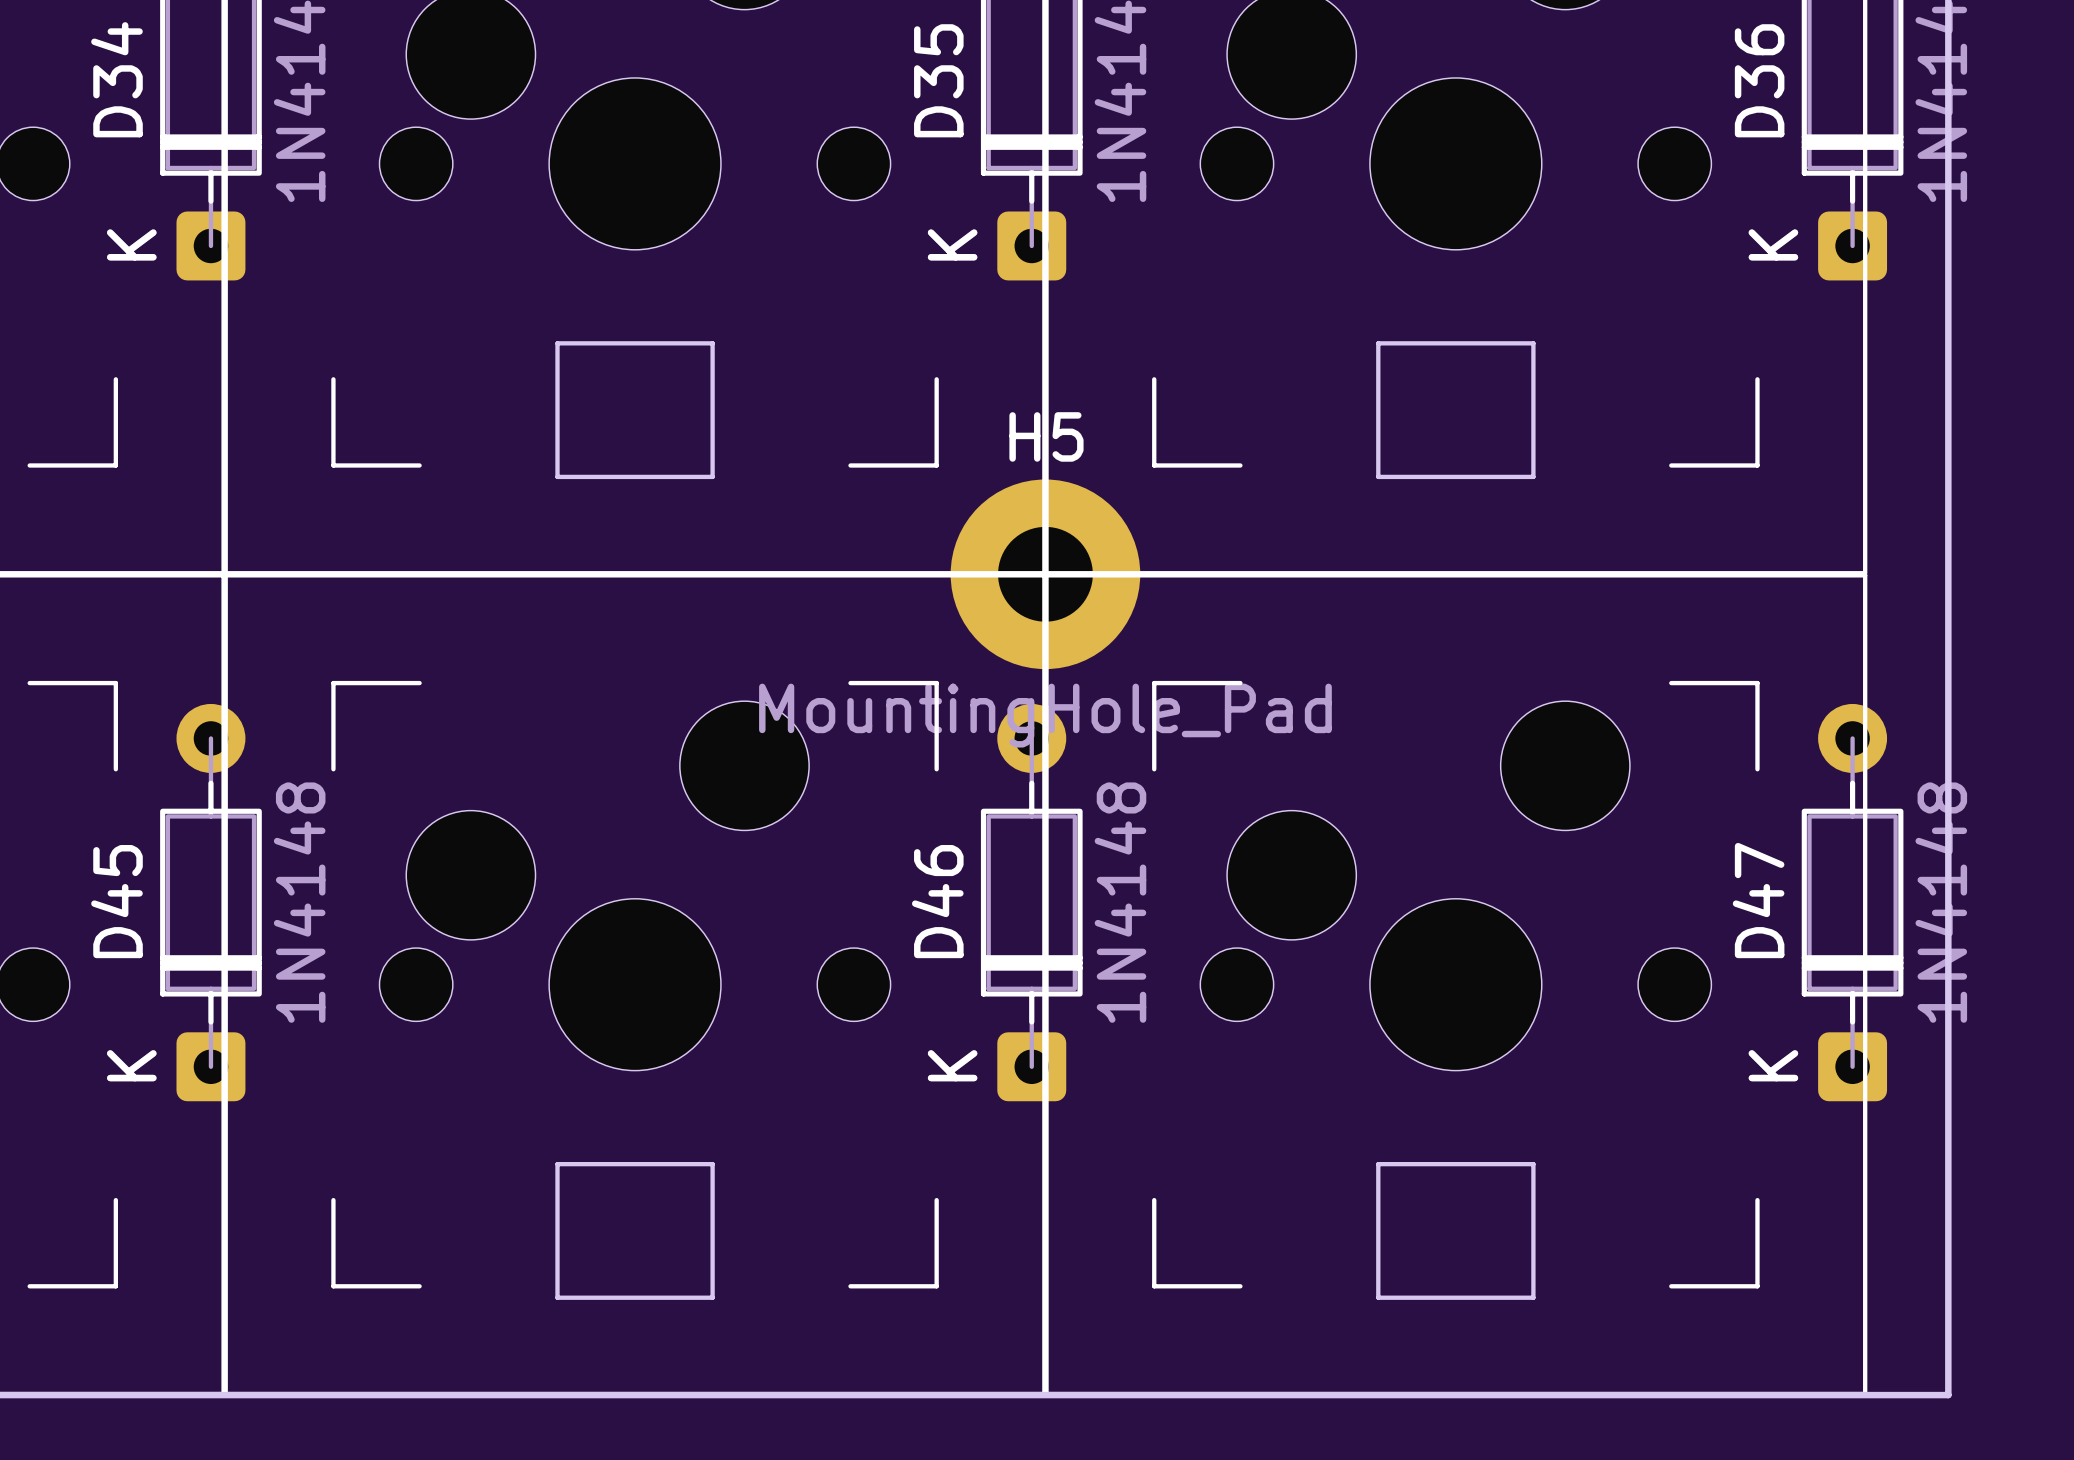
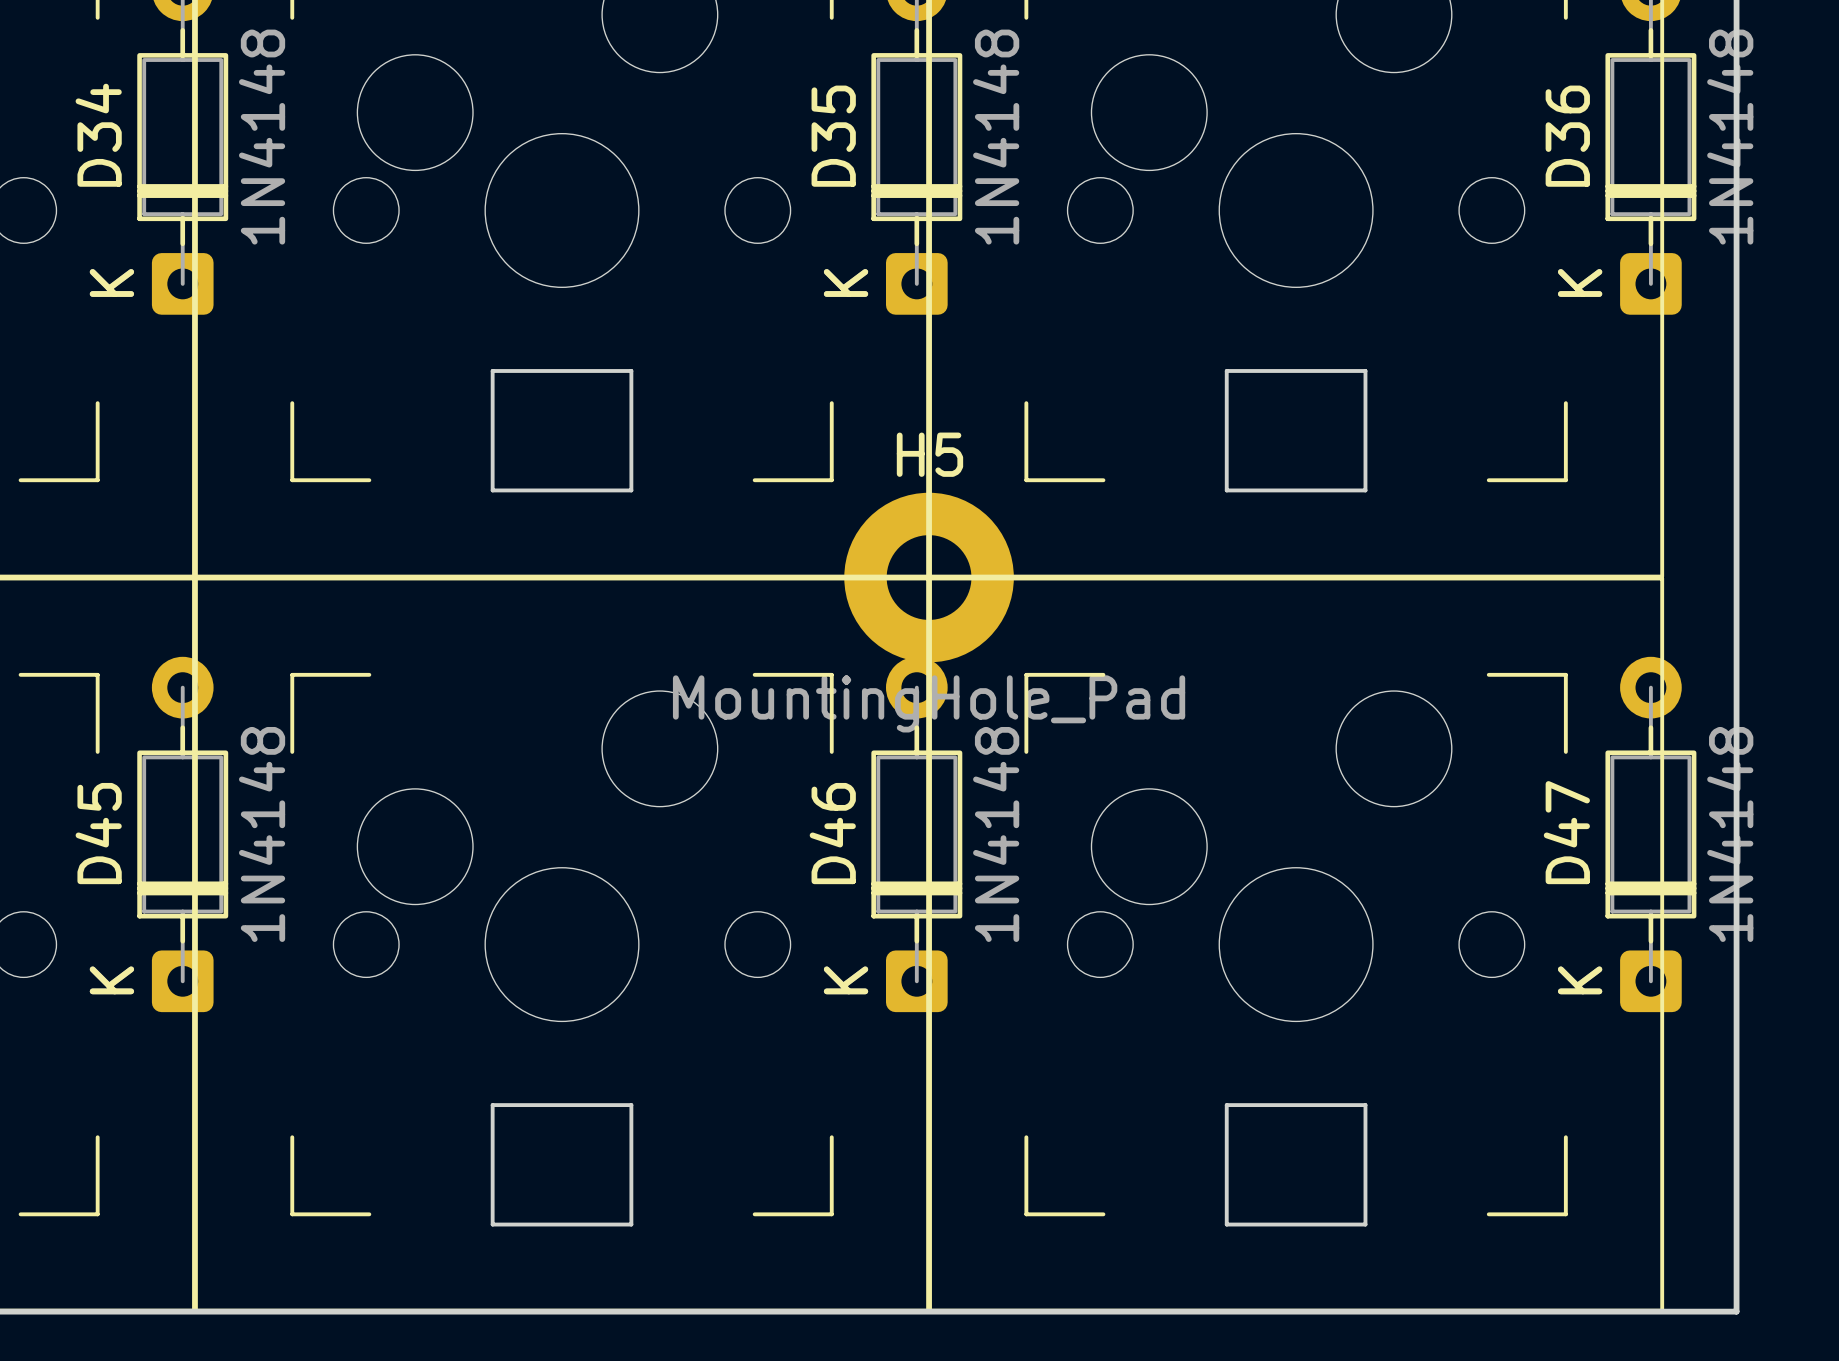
D45 position: (210, 902) -> (182, 834)
D46 position: (1031, 902) -> (916, 834)
D47 position: (1852, 902) -> (1650, 834)

